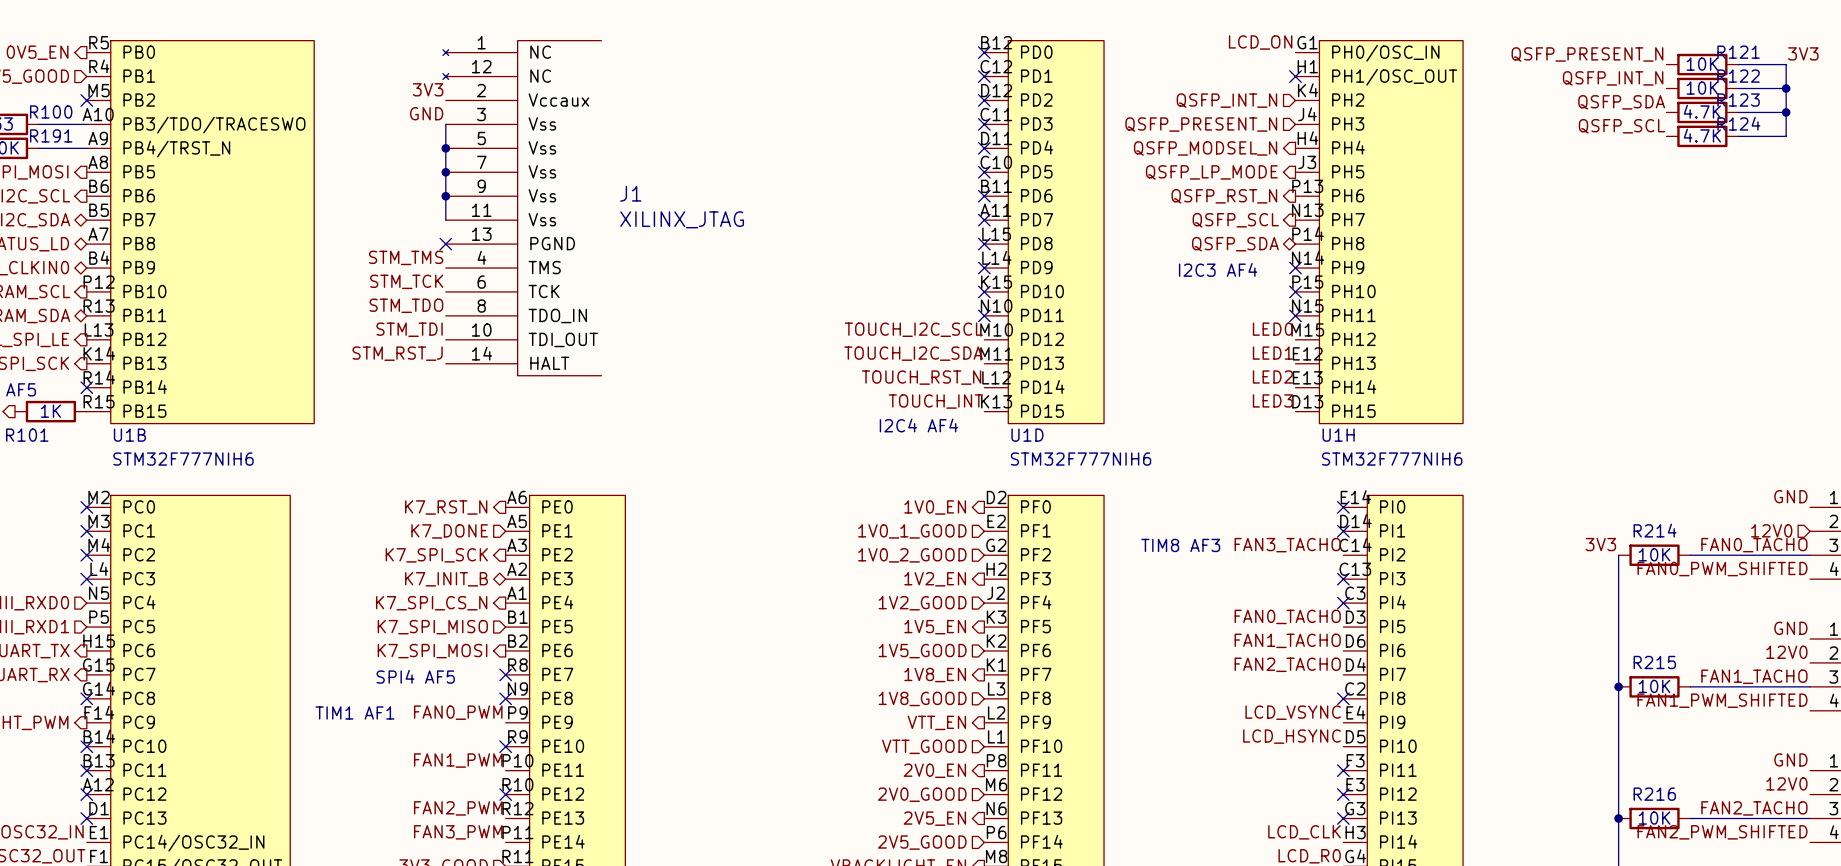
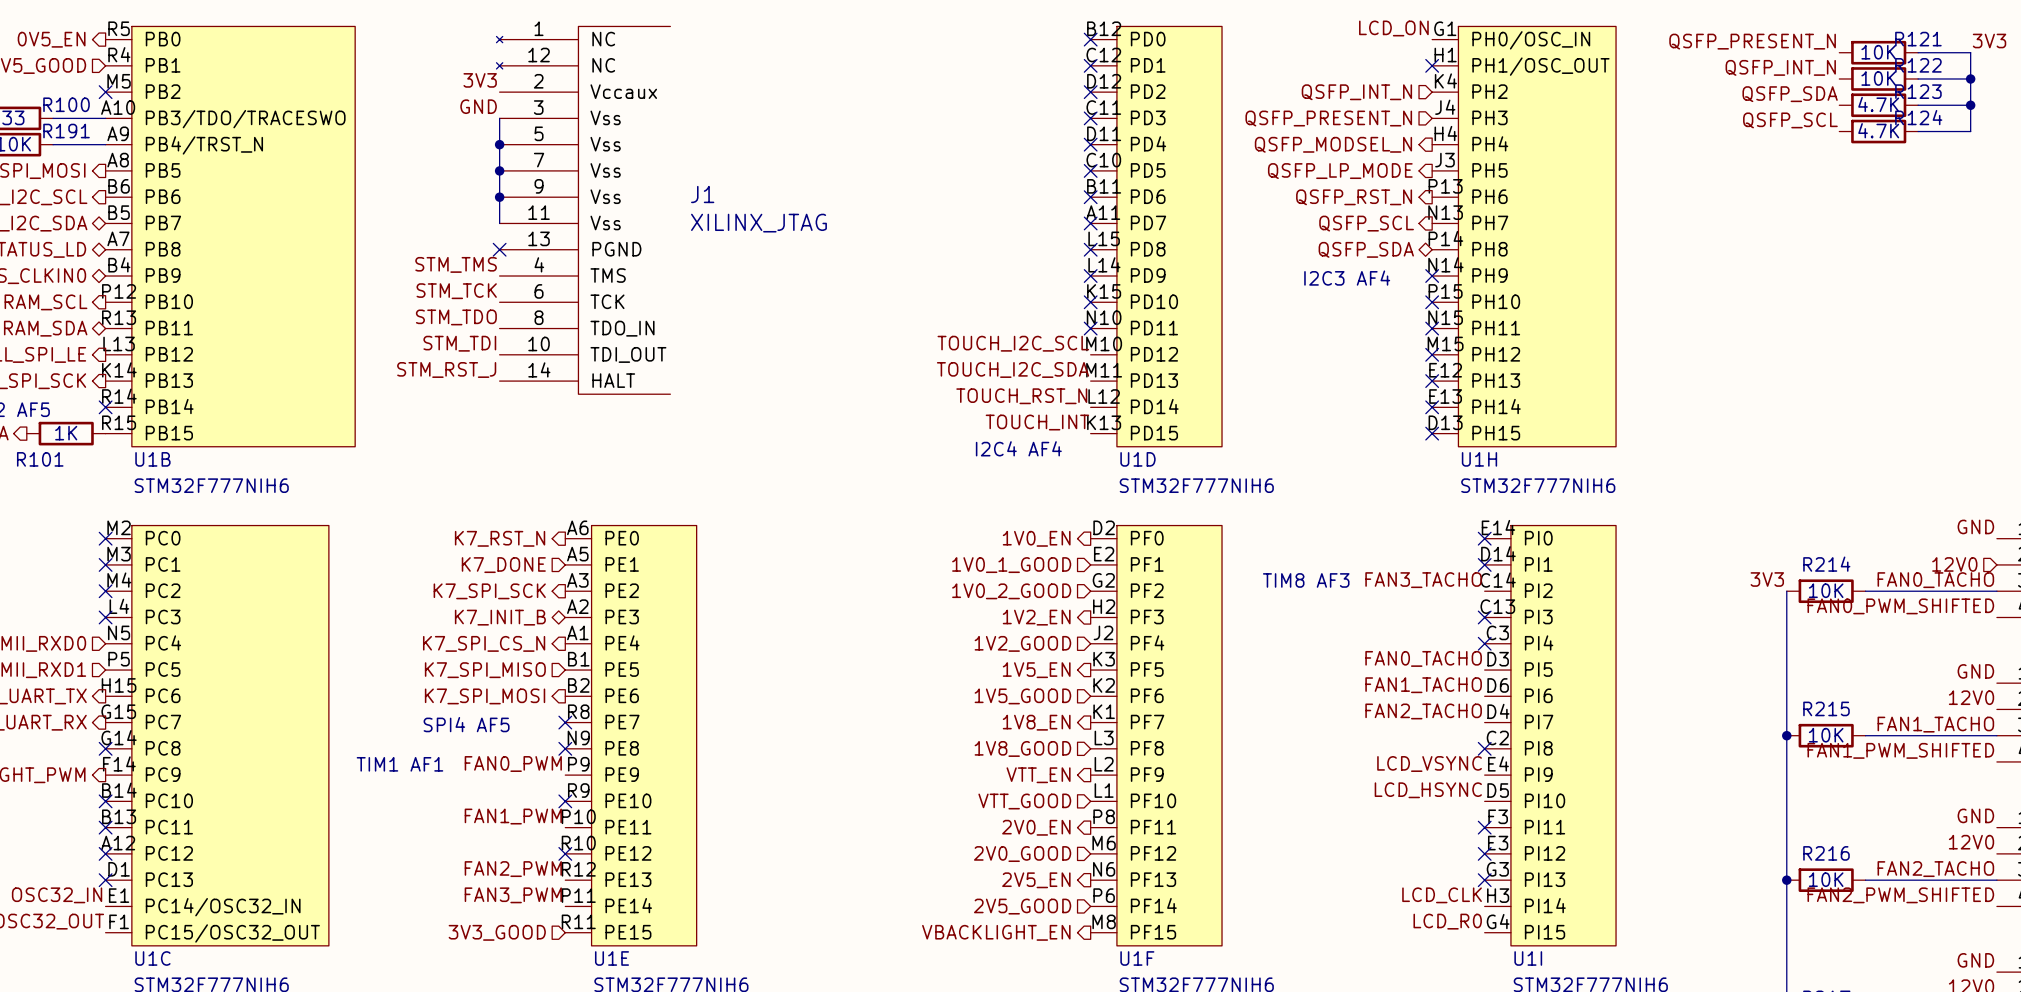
label: LED0 (1272, 329) -> none
no-connect mark: none -> (1432, 354)
label: LED1 (1272, 353) -> none
no-connect mark: none -> (1432, 381)
label: LED2 (1272, 377) -> none
no-connect mark: none -> (1432, 407)
label: LED3 (1272, 400) -> none
no-connect mark: none -> (1432, 433)

